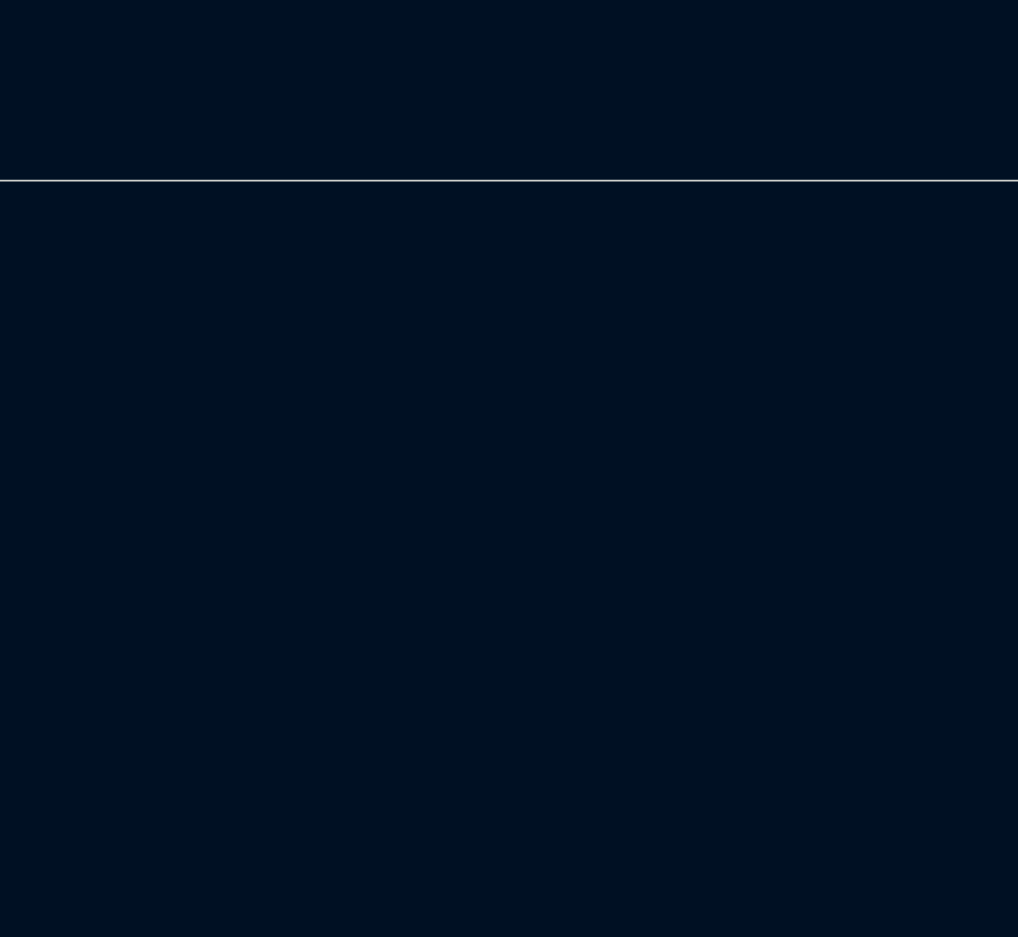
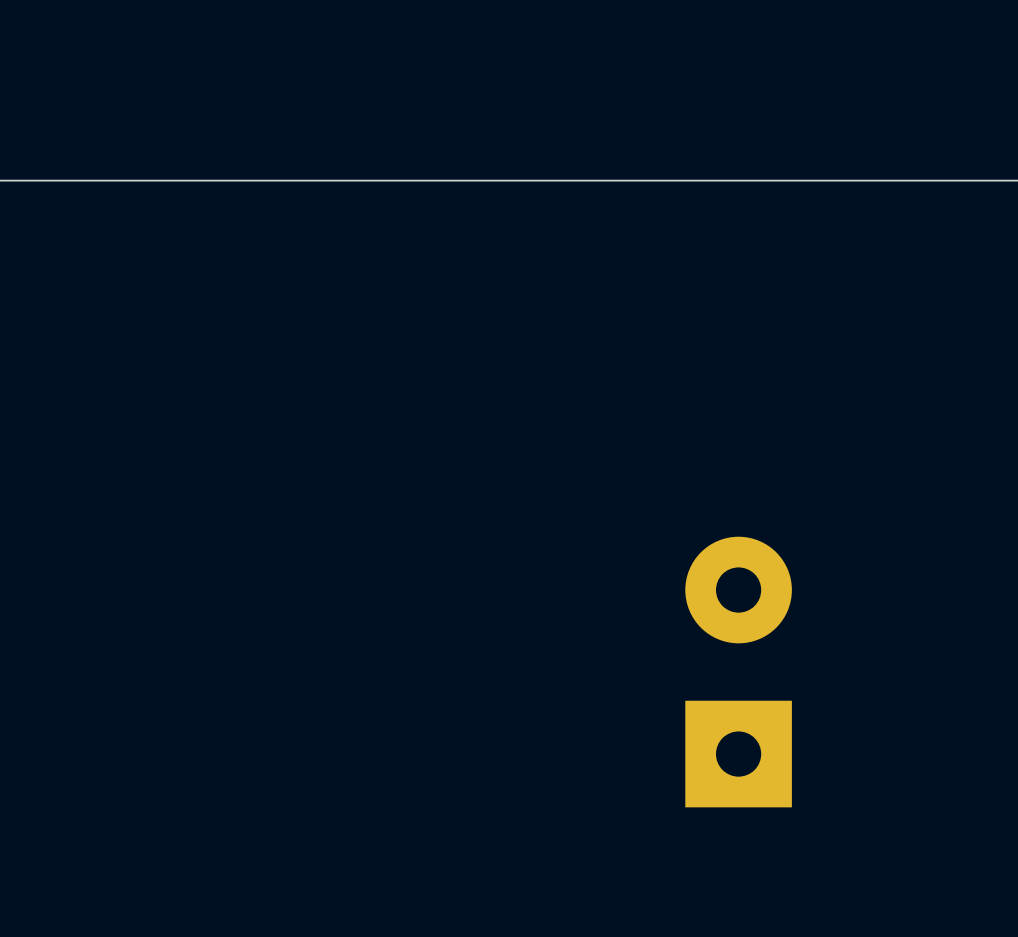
part: none -> (738, 672)

